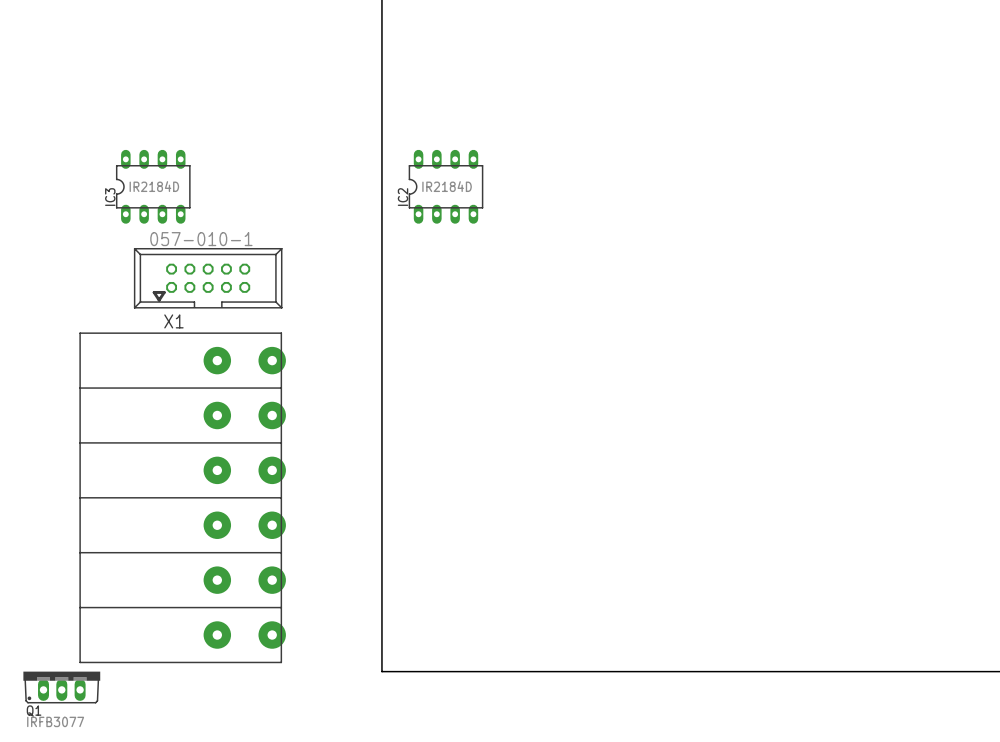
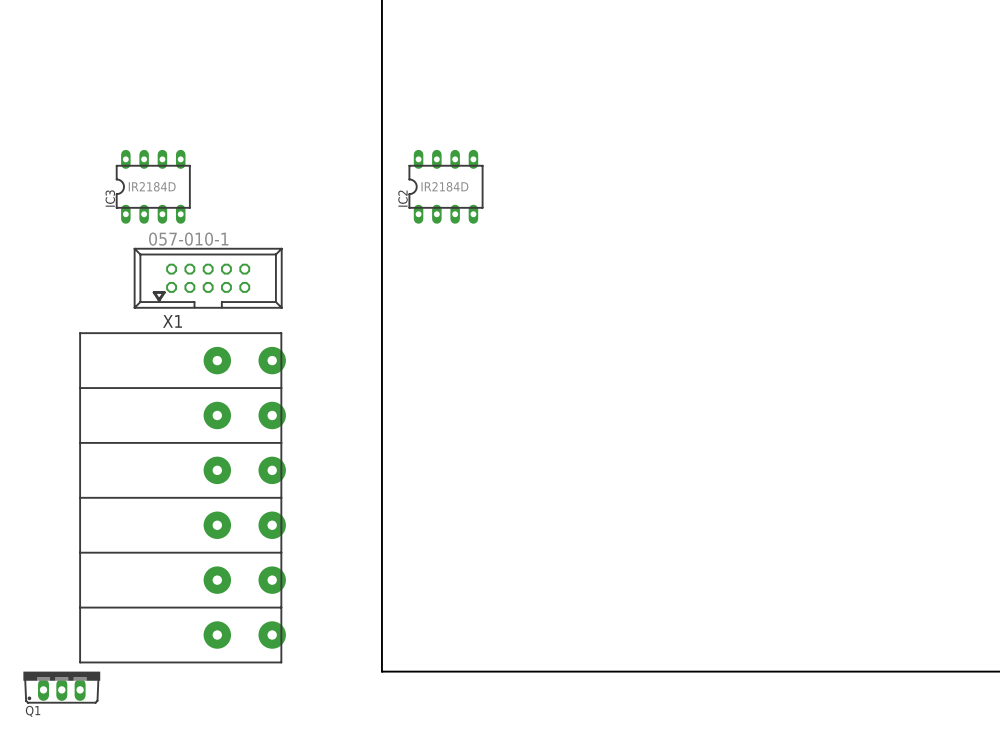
Q1 value: IRFB3077 (55, 721) -> none

